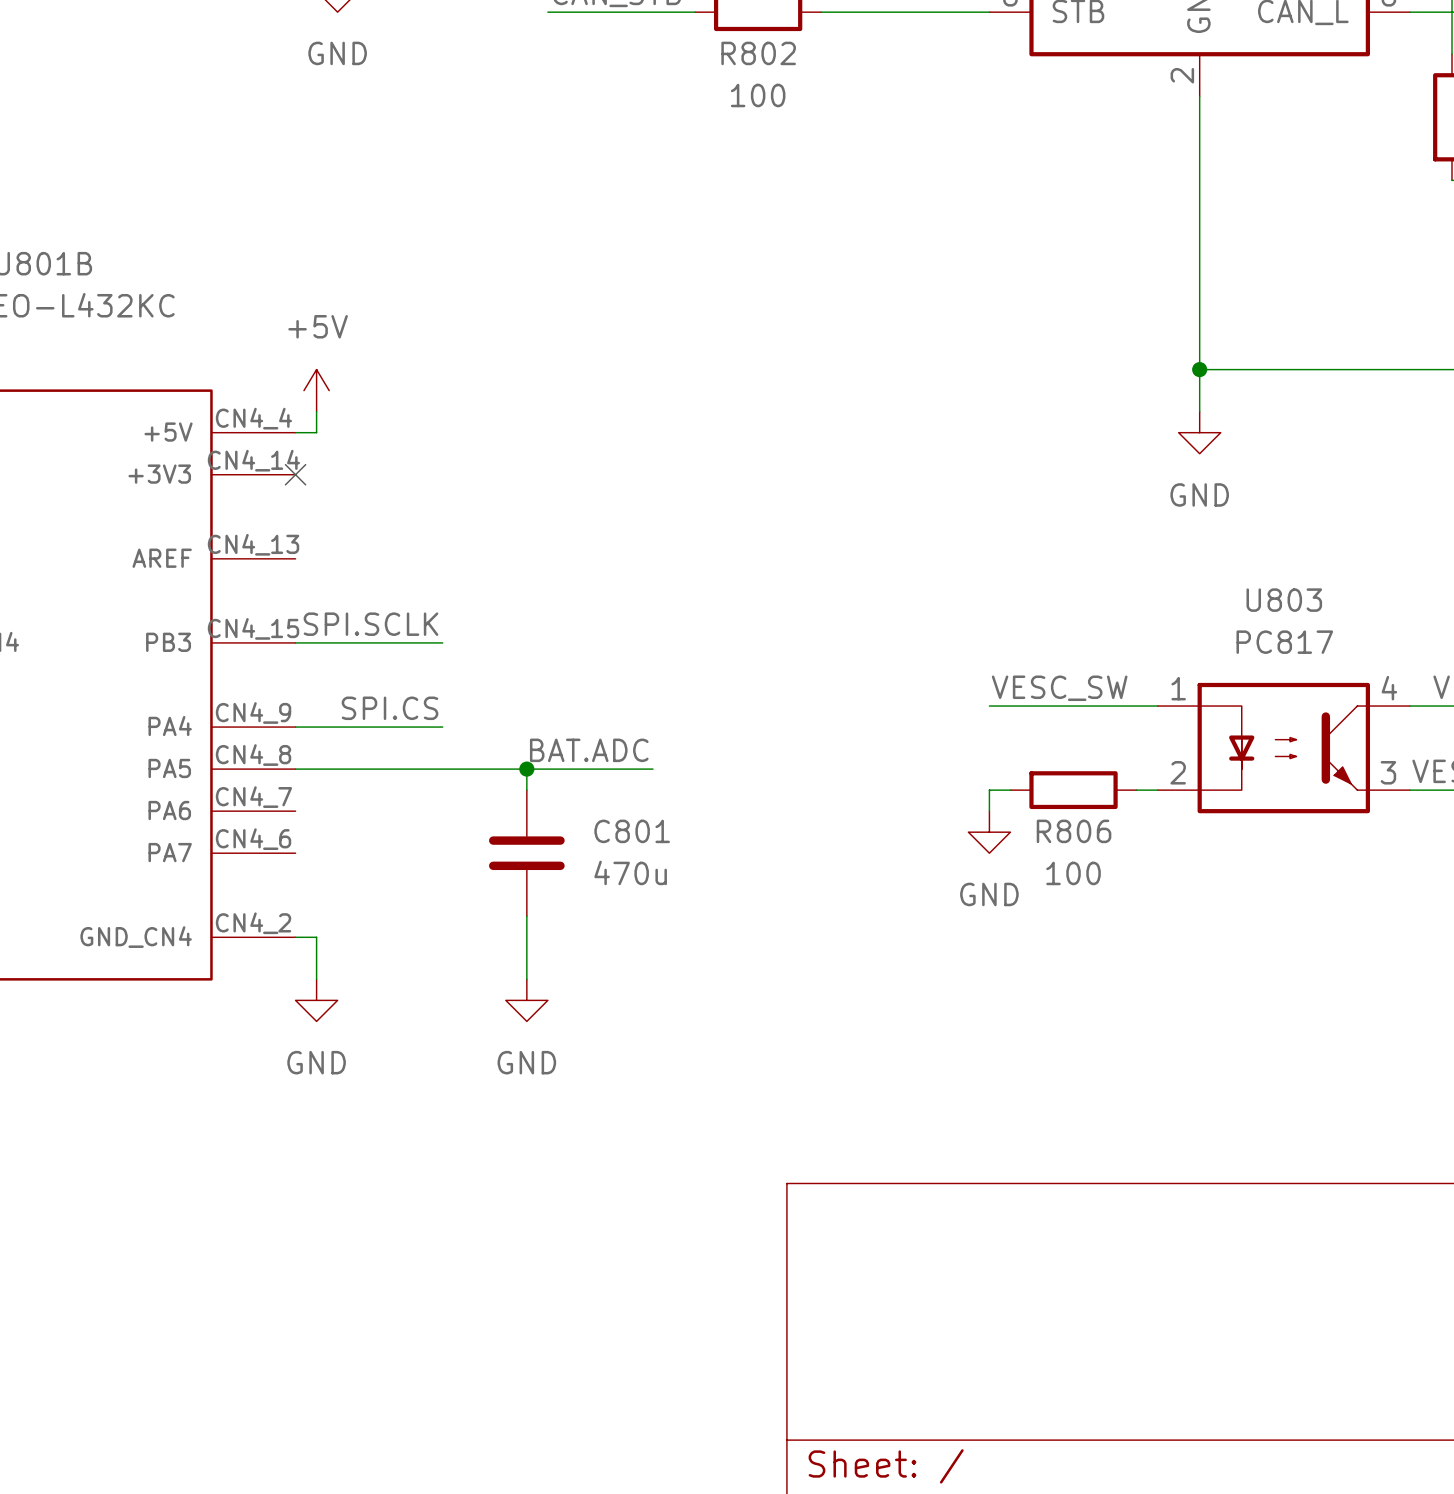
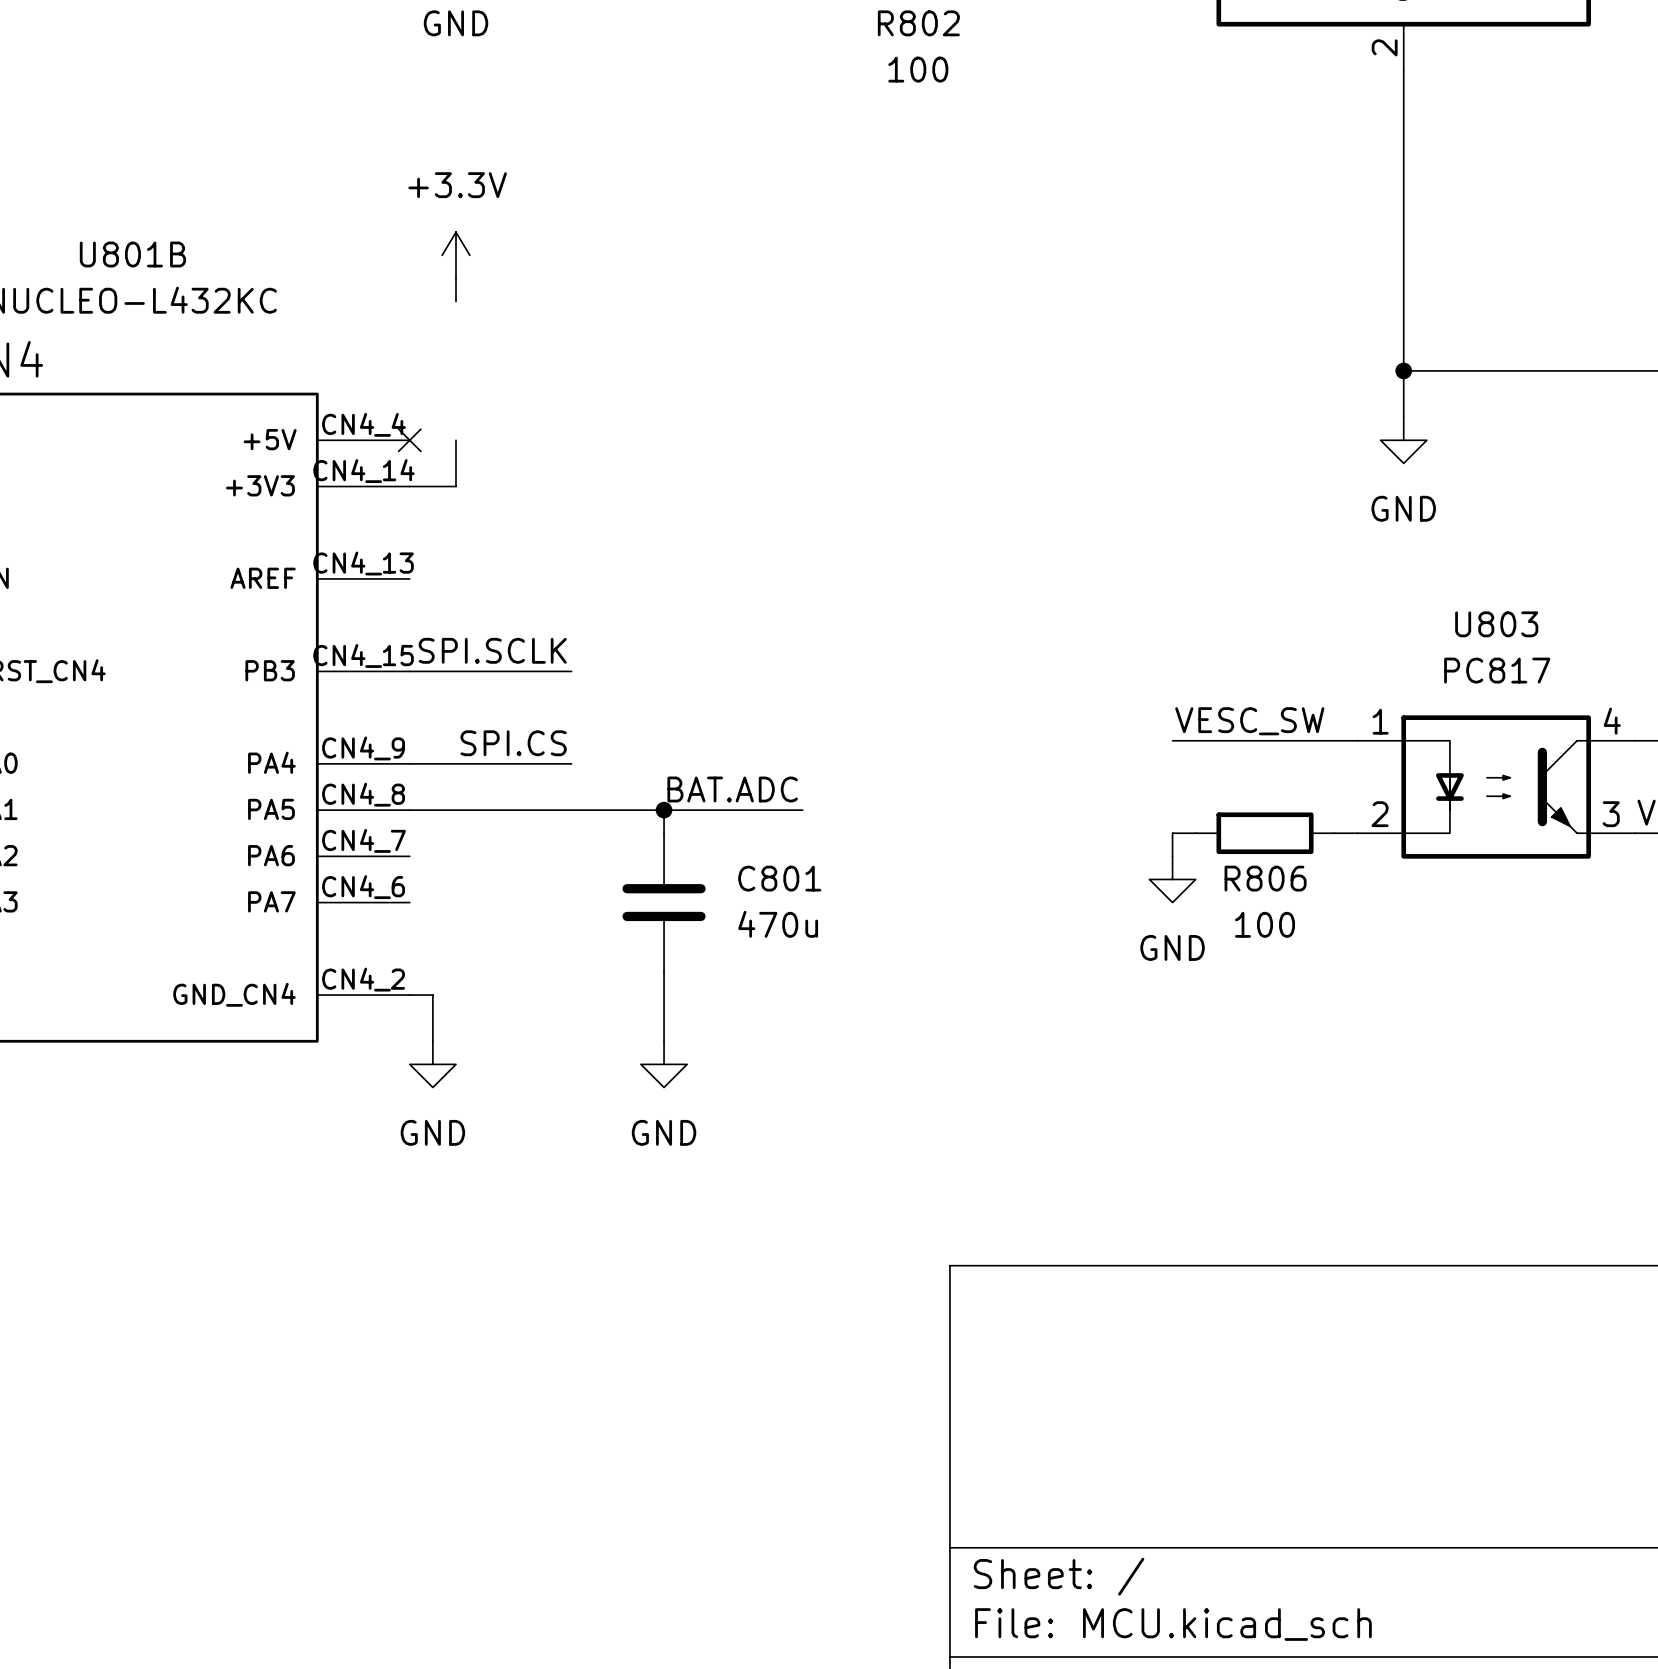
power symbol: none -> +3.3V (456, 255)
wire: none -> (456, 278) (456, 301)
power symbol: +5V (316, 390) -> none
wire: (316, 411) (316, 432) (295, 432) -> none
wire: none -> (456, 440) (456, 486) (409, 486)
no-connect mark position: (295, 474) -> (409, 440)

